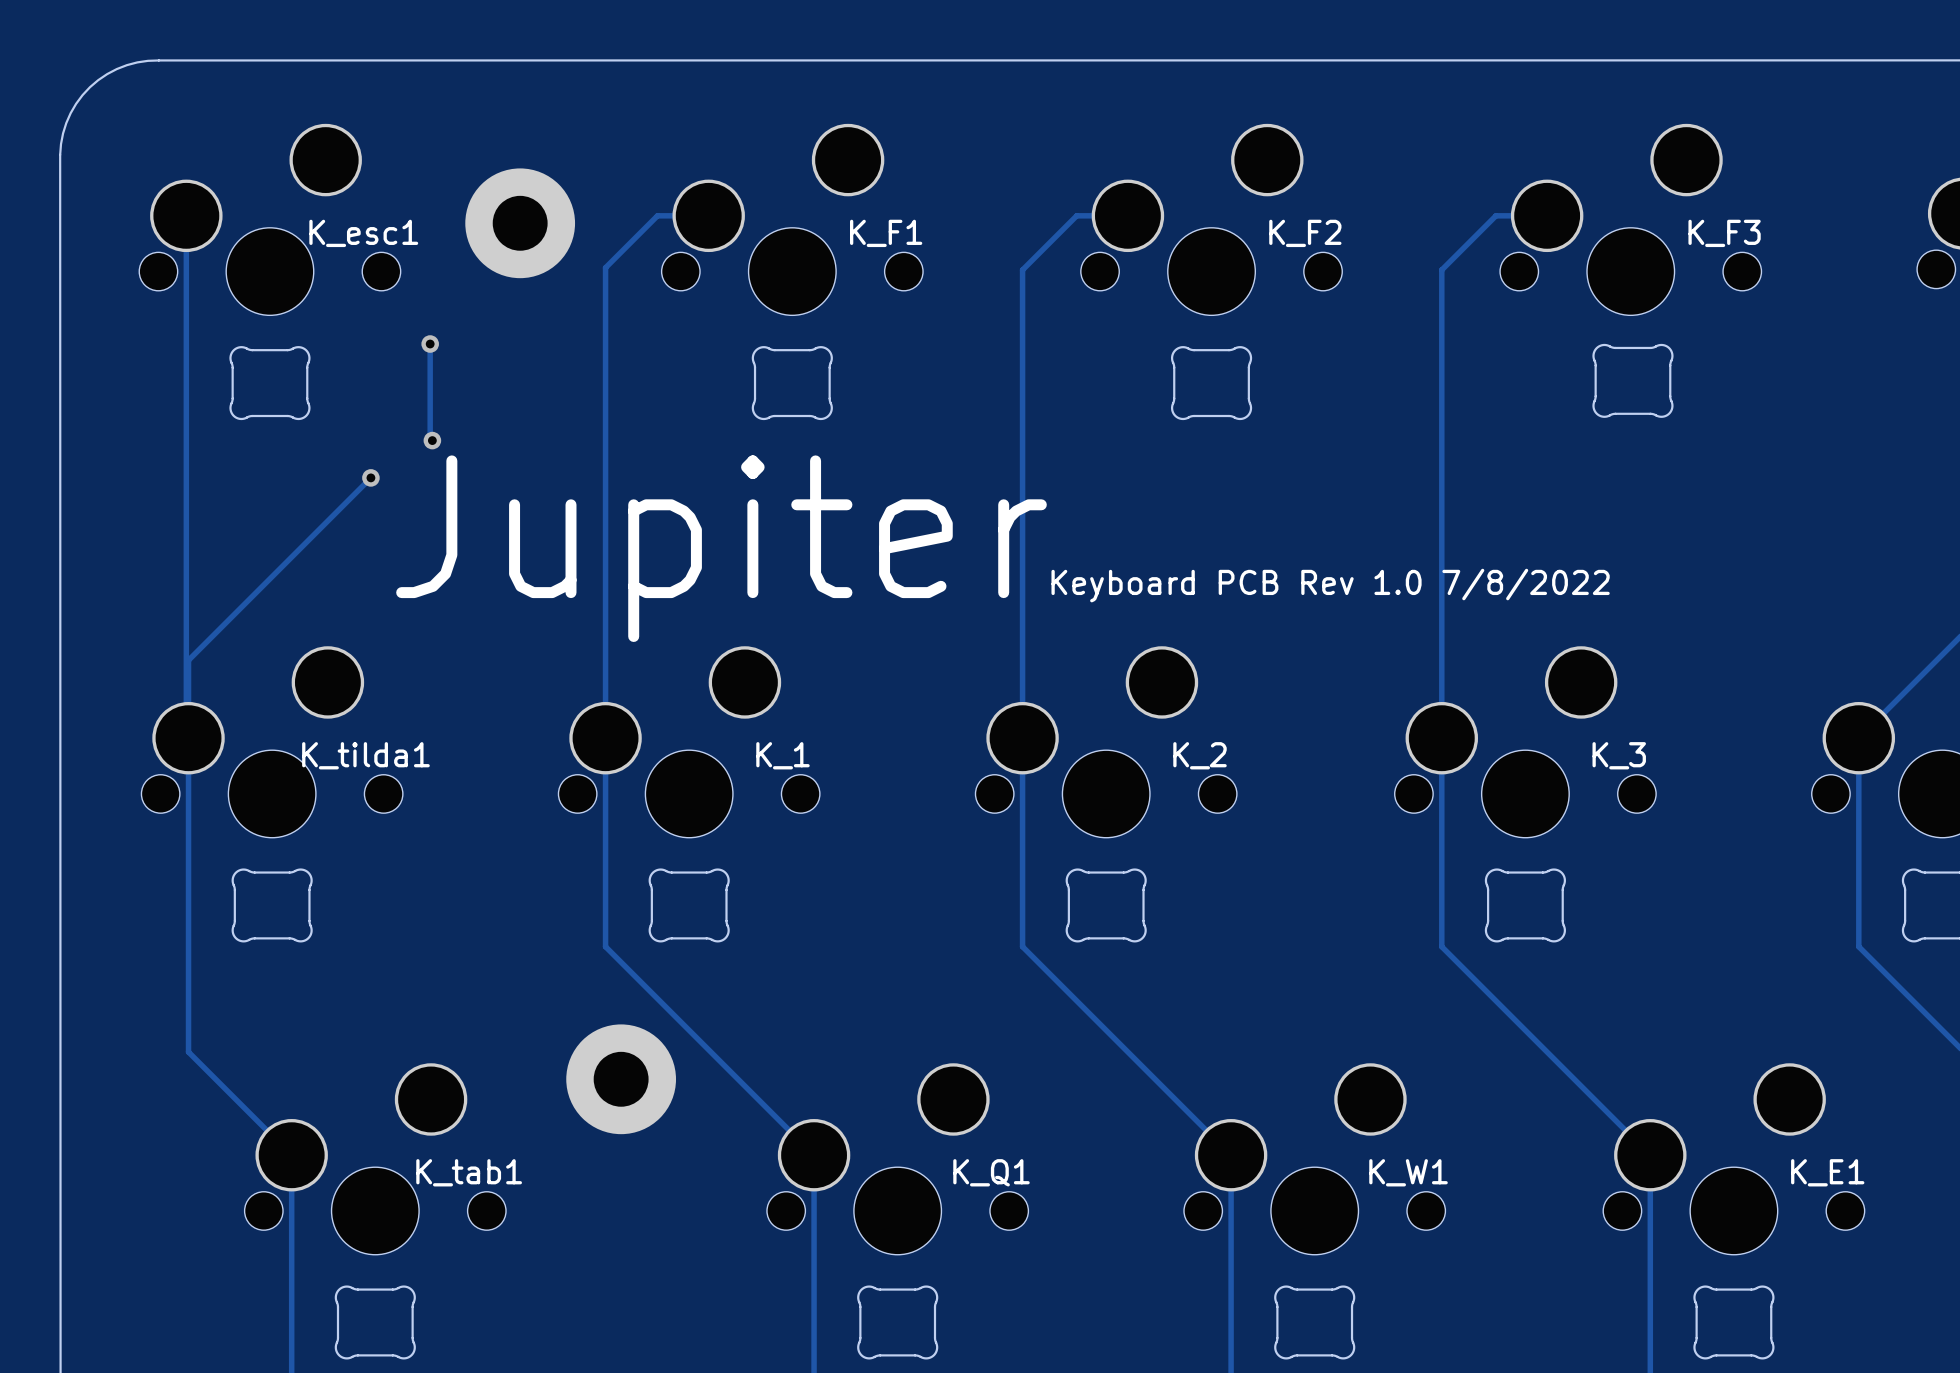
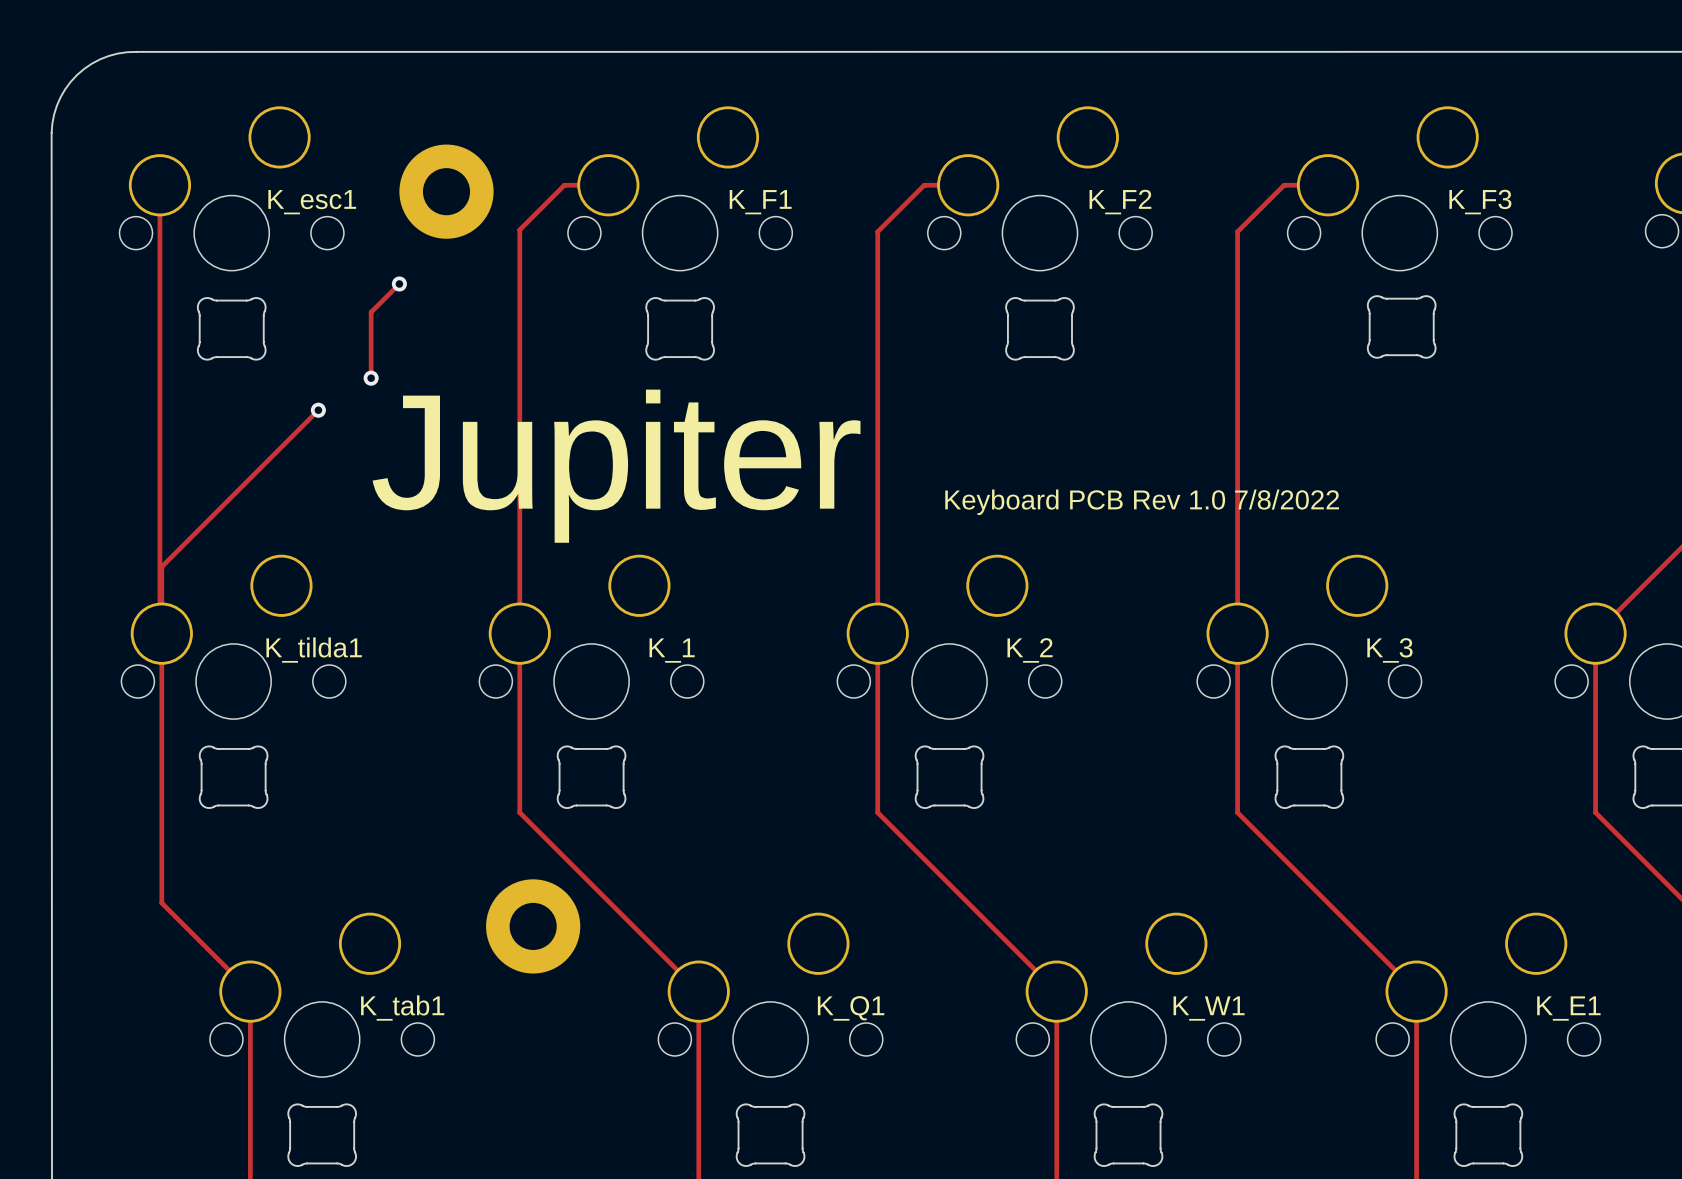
track: none -> (399, 283) (371, 312) (371, 378)
track: (430, 344) (430, 438) -> none
via position: (430, 344) -> (399, 283)

